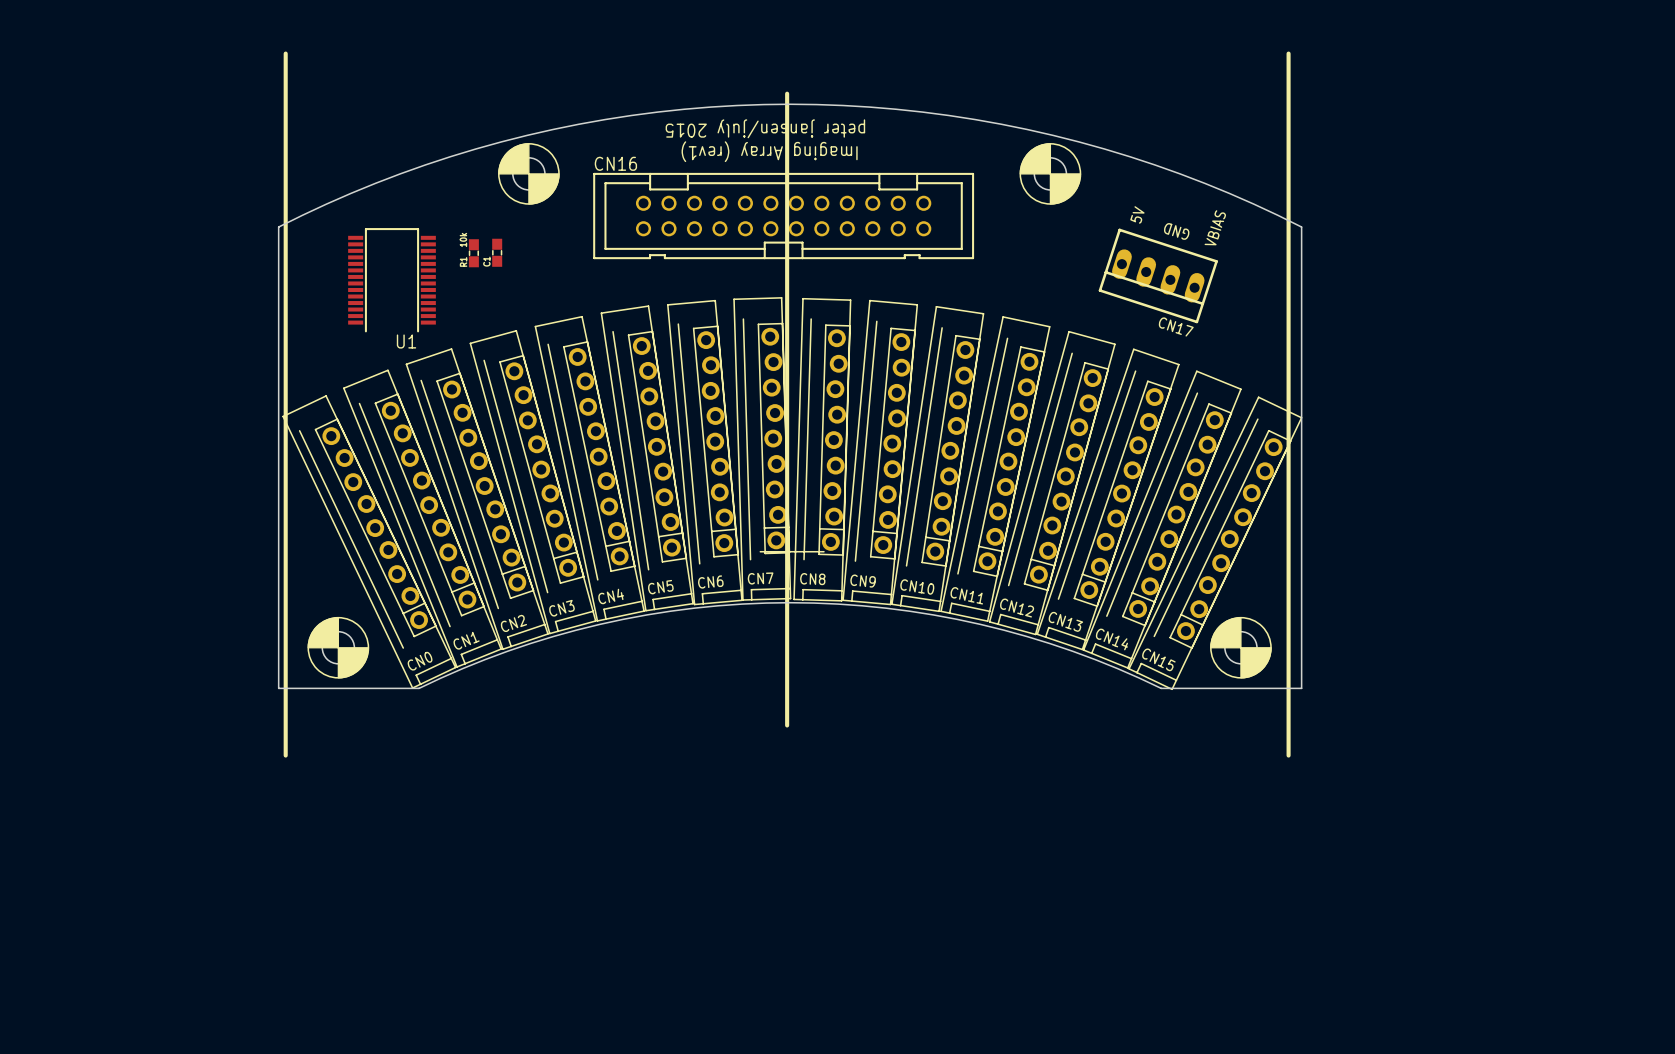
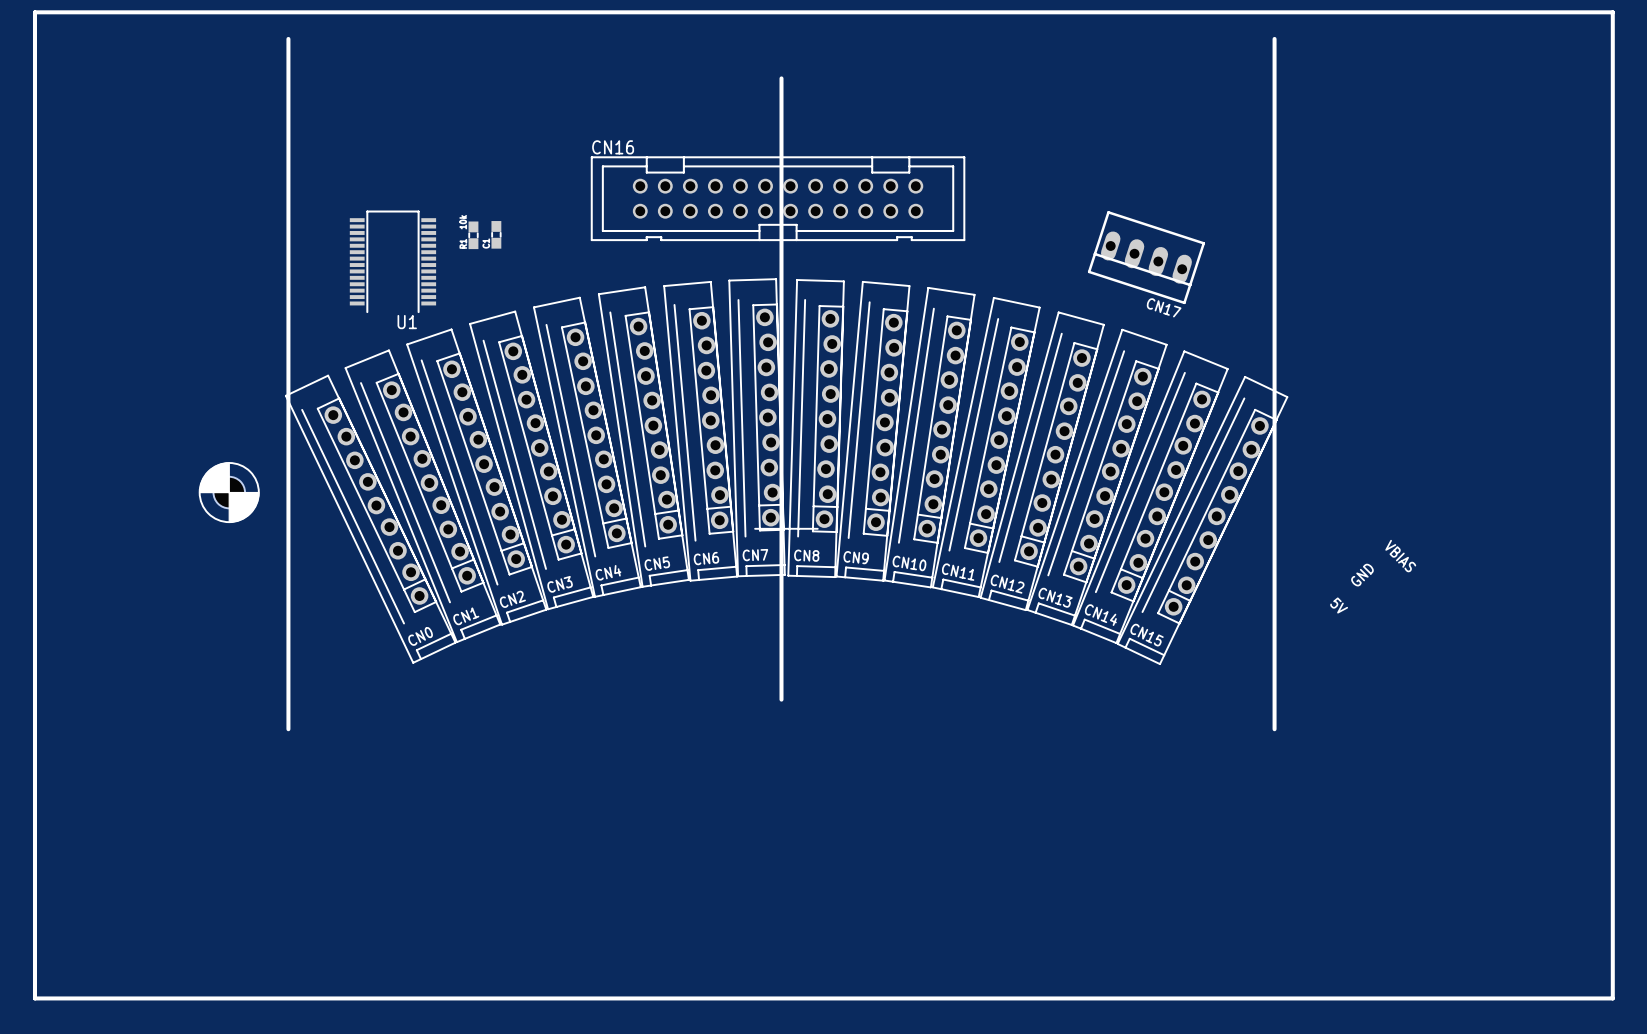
line: none -> (34, 12) (34, 998) (1612, 998) (1612, 12) (34, 12)
text: peter jansen/july 2015 (765, 128) -> none
text: Imaging Array (rev1) (769, 151) -> none
part: (528, 173) -> none
part: (1050, 173) -> none
text: 5V (1137, 214) -> none
board edge: (278, 227) (278, 688) (419, 688) (507, 651) (599, 624) (694, 608) (790, 602) (885, 608) (980, 624) (1072, 651) (1161, 688) (1301, 688) (1301, 227) (1253, 204) (1155, 165) (1078, 141) (1027, 129) (948, 115) (896, 109) (843, 105) (763, 104) (684, 109) (631, 115) (553, 129) (501, 141) (425, 165) (375, 183) (278, 227) -> none
text: VBIAS (1215, 227) -> none
text: GND (1176, 231) -> none
text: none -> VBIAS (1400, 556)
text: none -> GND (1362, 575)
text: none -> 5V (1339, 605)
part position: (338, 647) -> (229, 492)
part: (1240, 647) -> none

